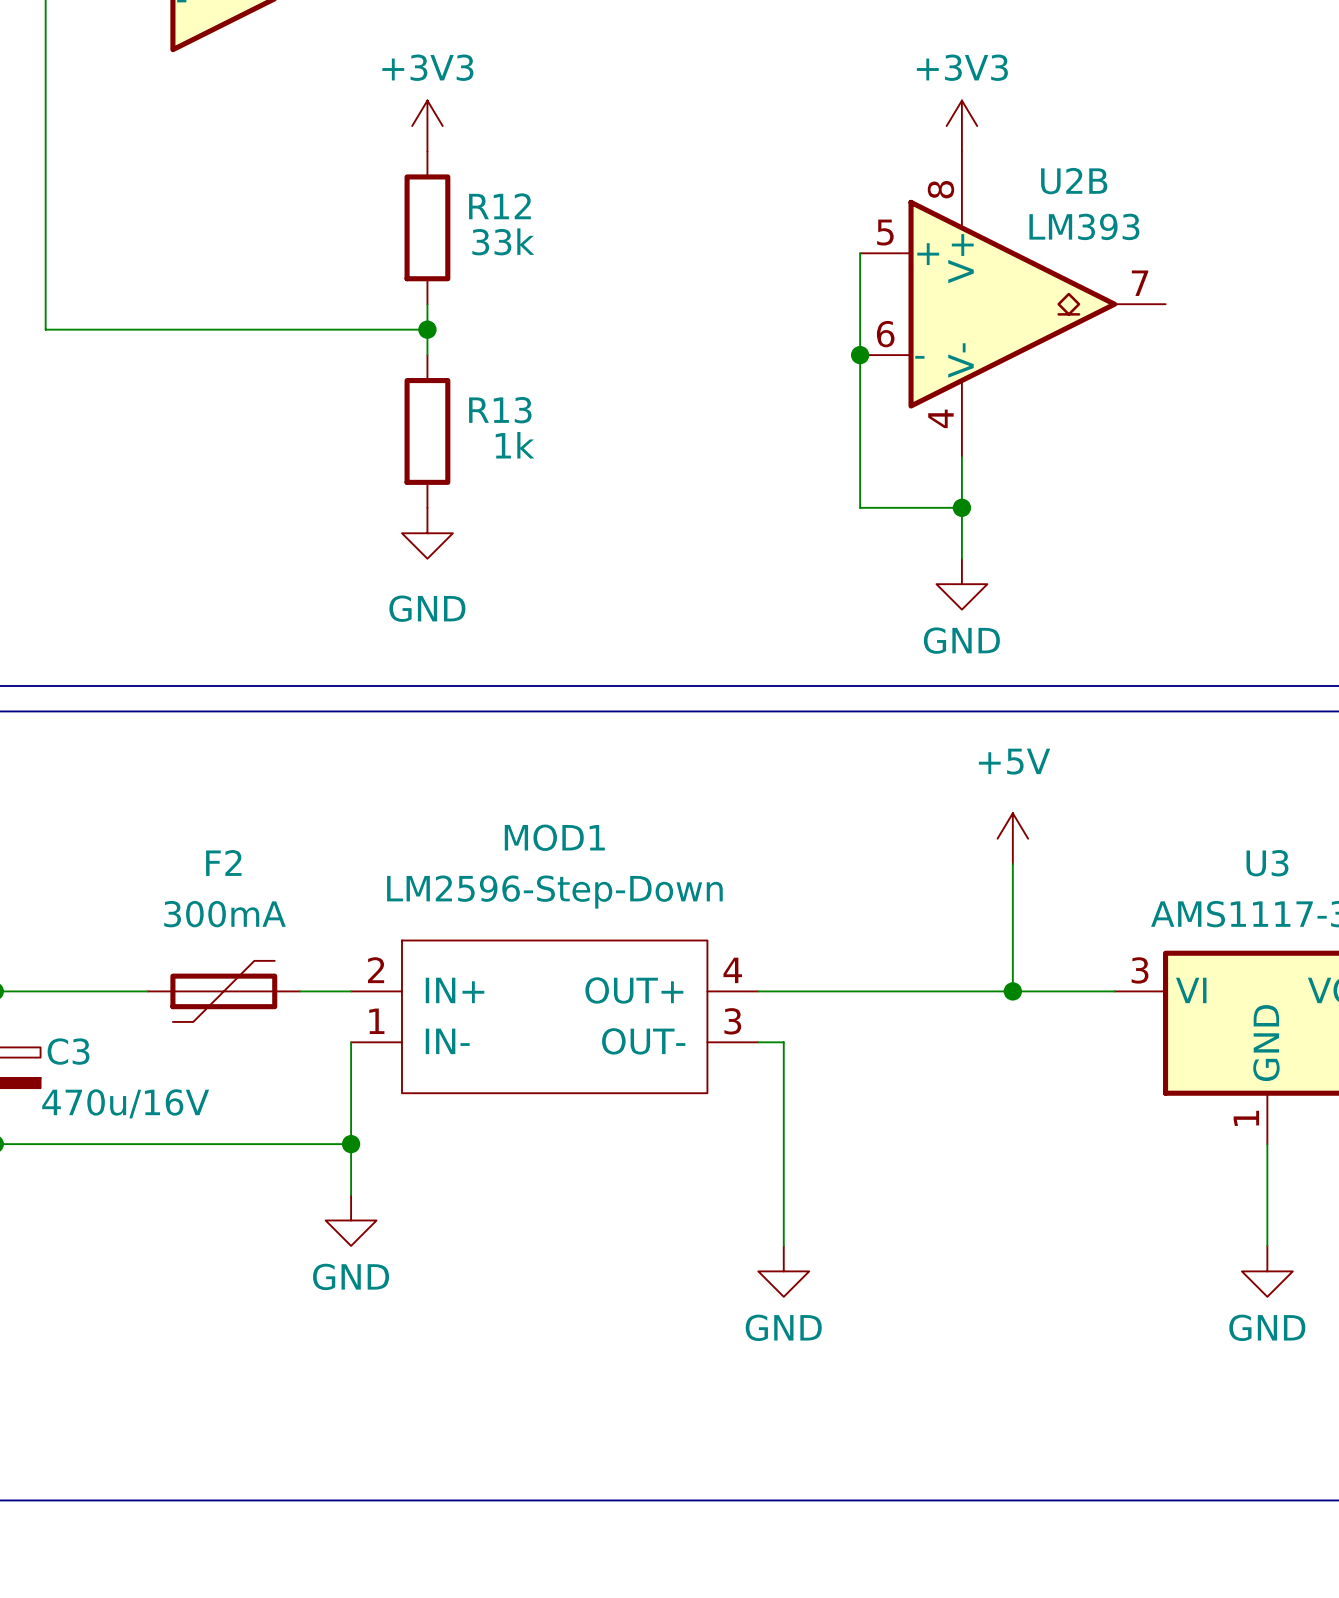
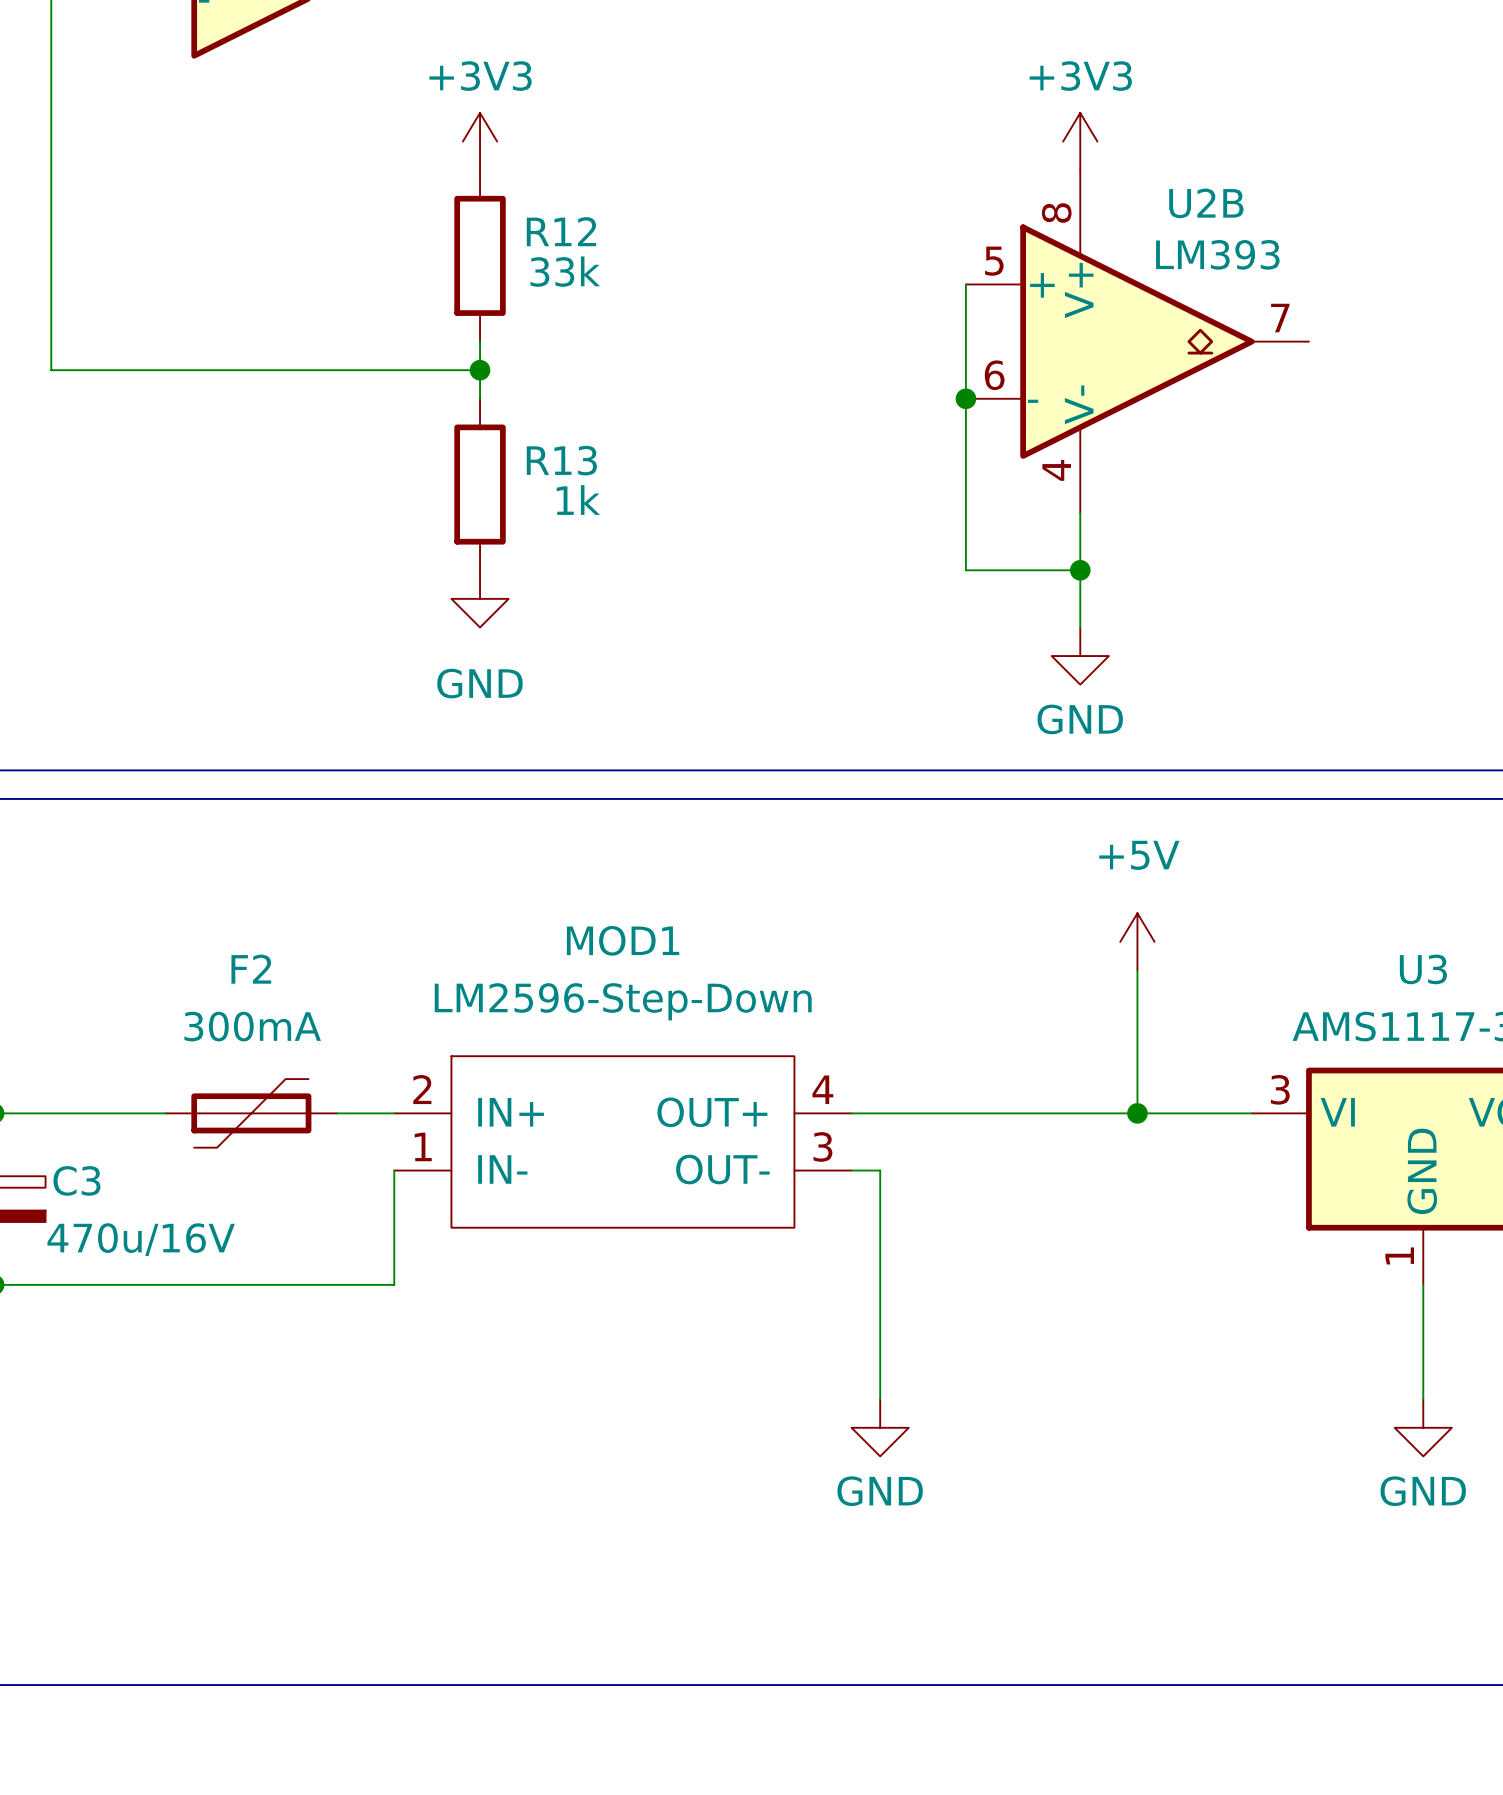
wire: (351, 1144) (351, 1195) -> none
junction: (351, 1144) -> none
power symbol: GND (351, 1220) -> none

